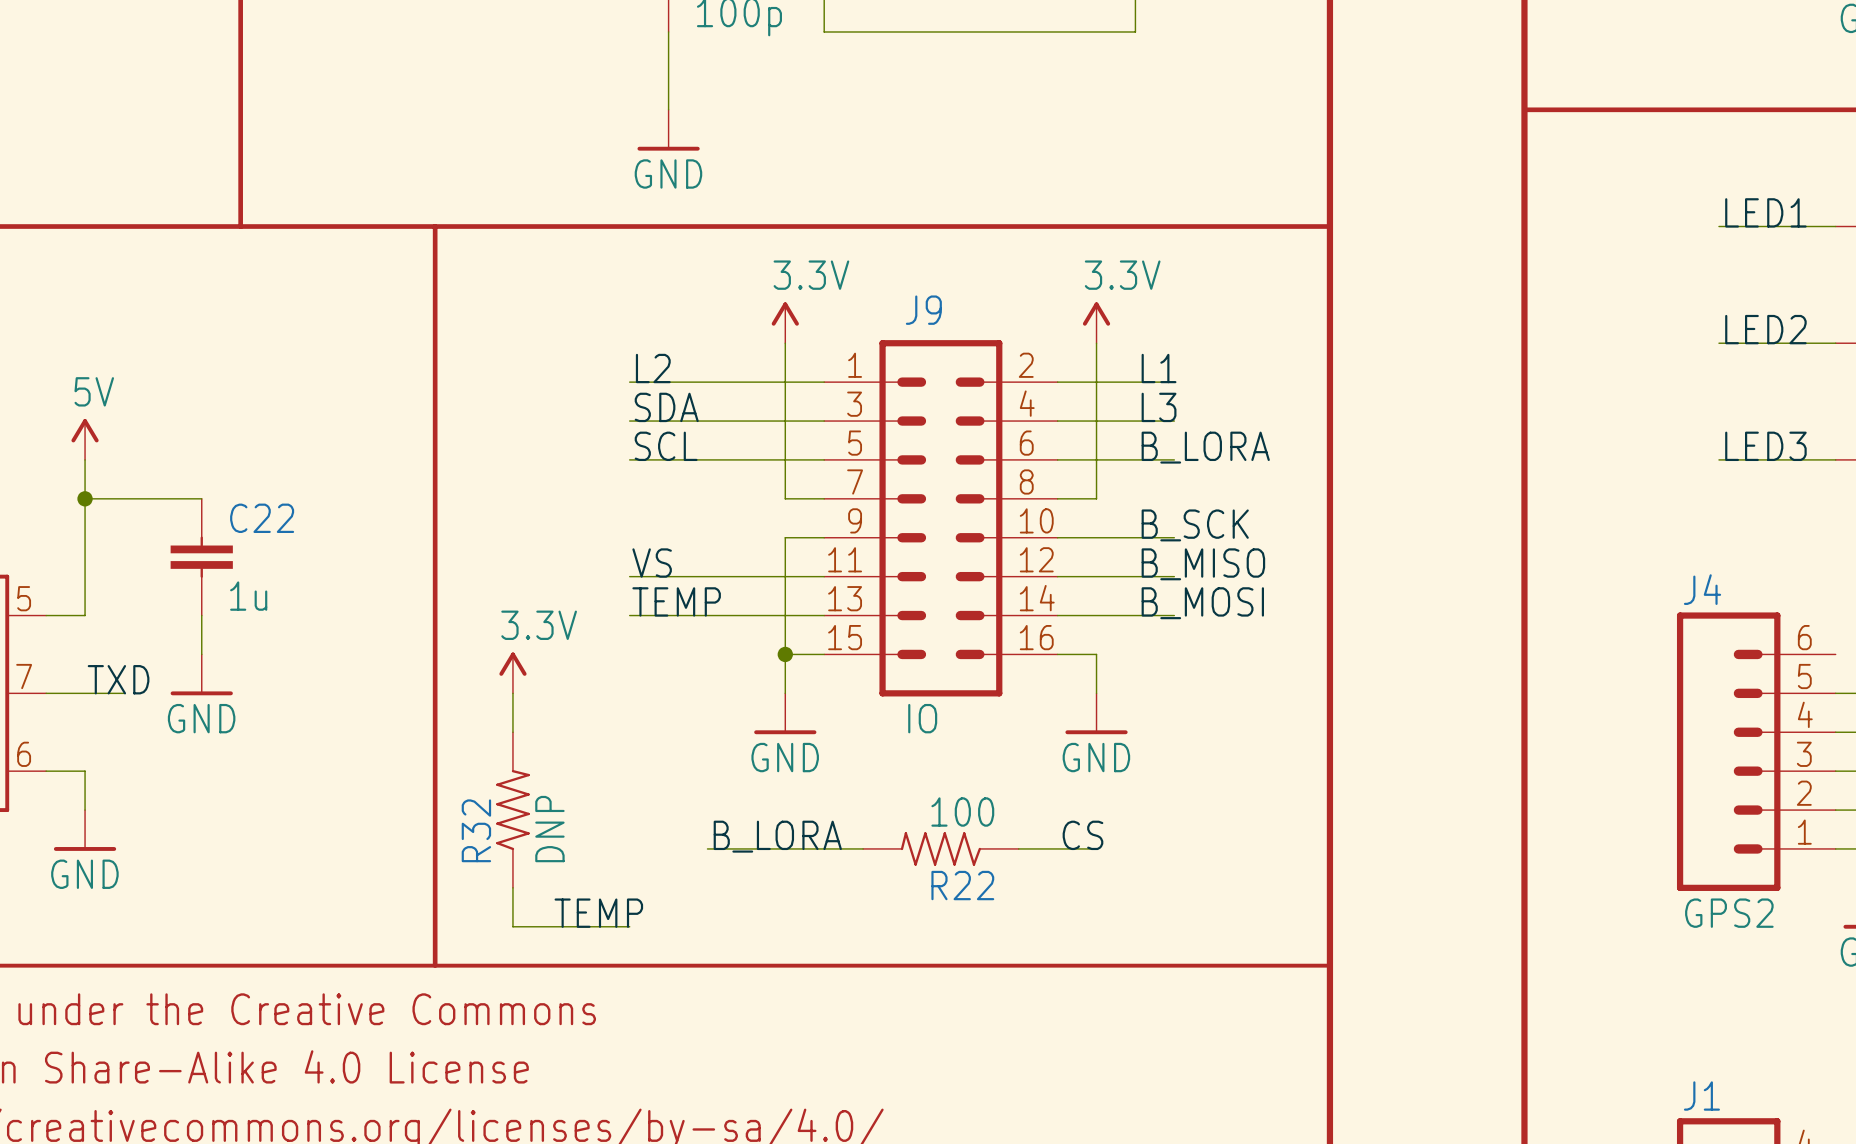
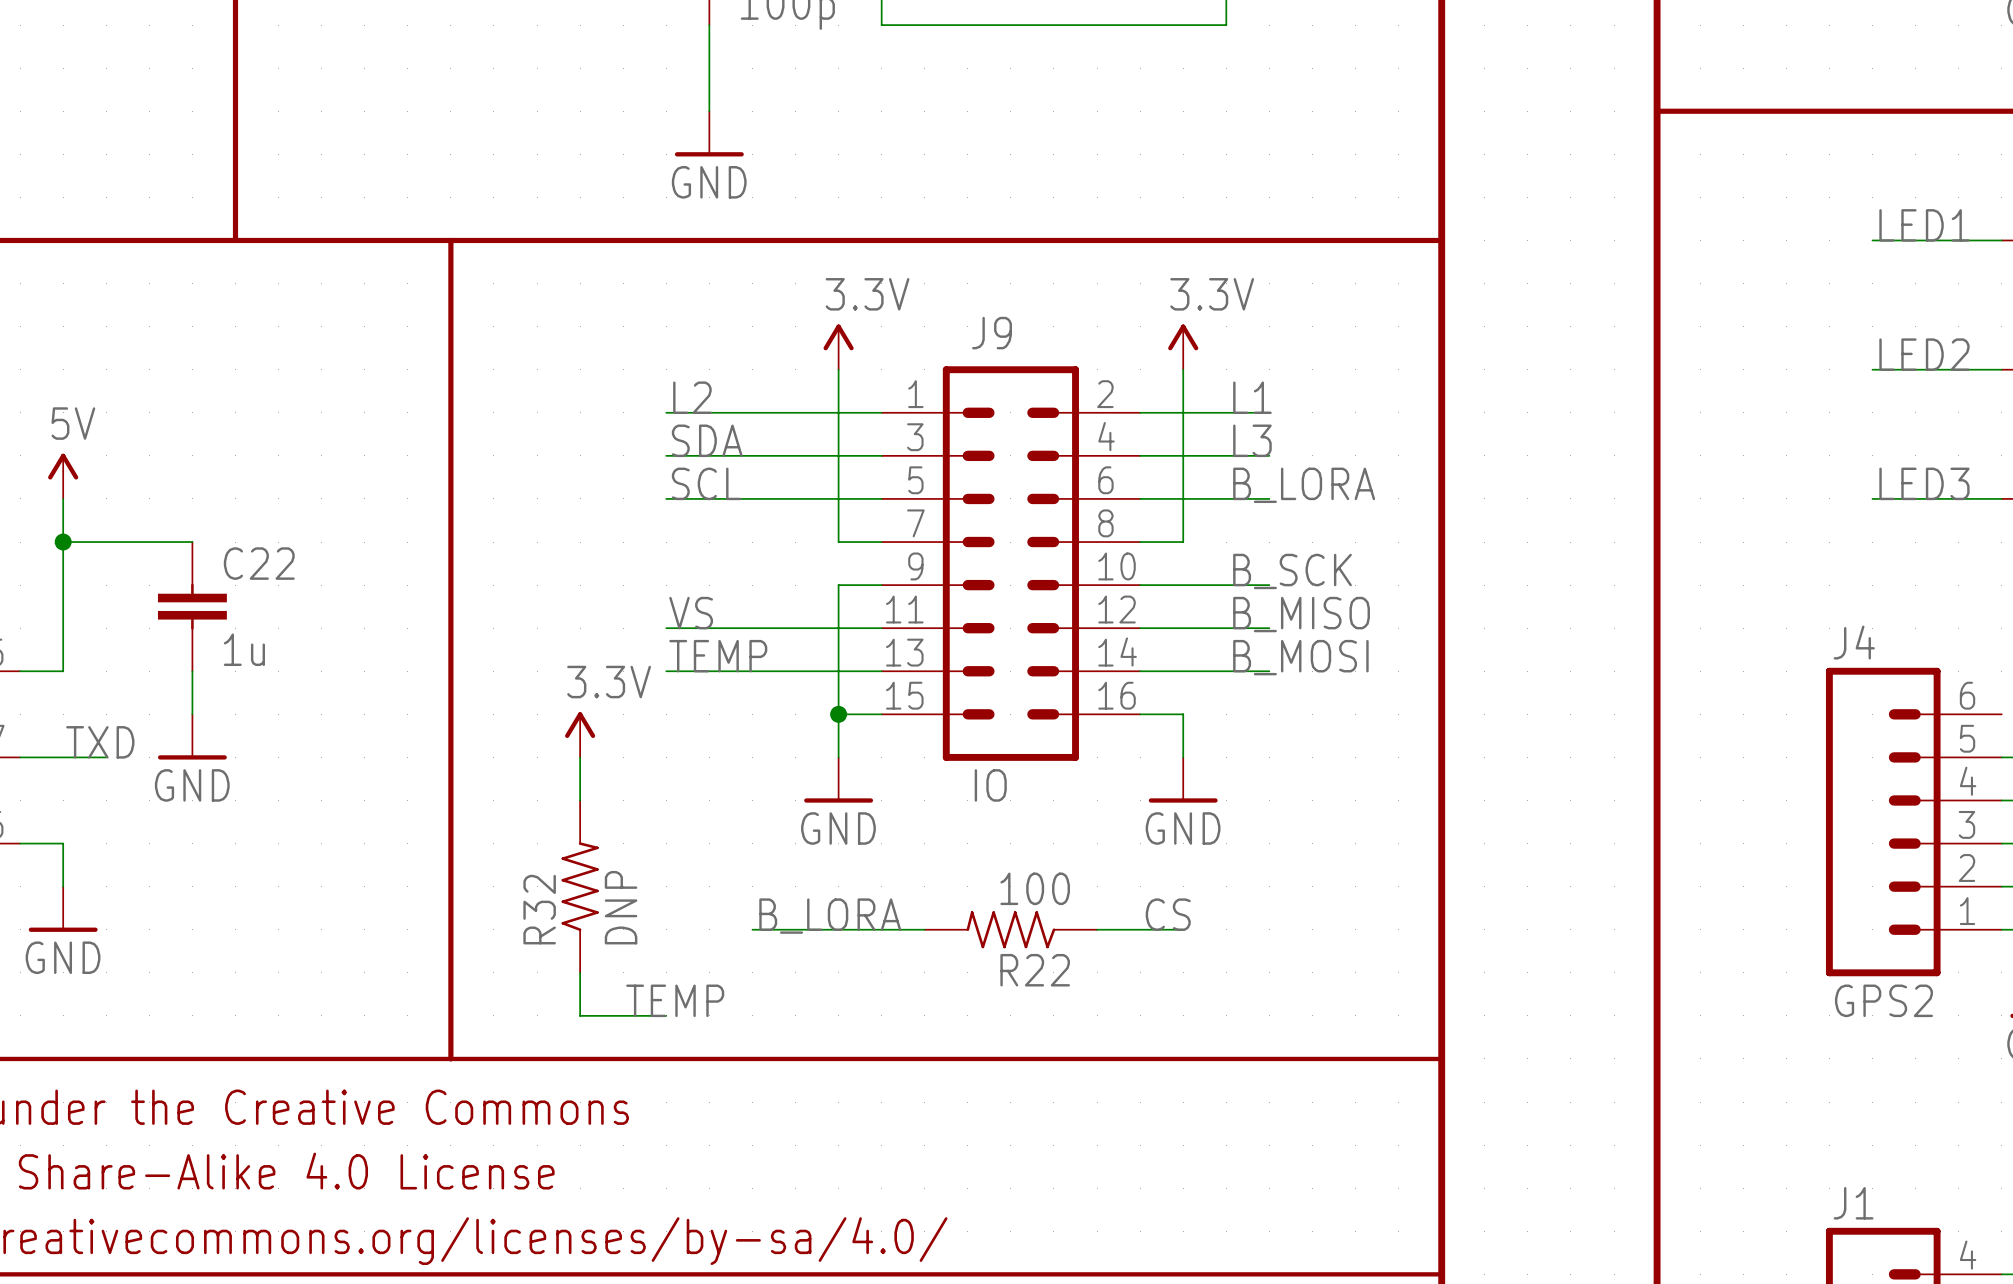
power symbol position: 3.3V (512, 672) -> 3.3V (580, 734)
wire: (512, 693) (512, 732) -> (580, 757) (580, 800)
R32 position: (512, 810) -> (580, 886)
wire: (512, 887) (512, 926) (551, 926) -> (580, 972) (580, 1015)
label position: TEMP (598, 913) -> TEMP (675, 1000)

